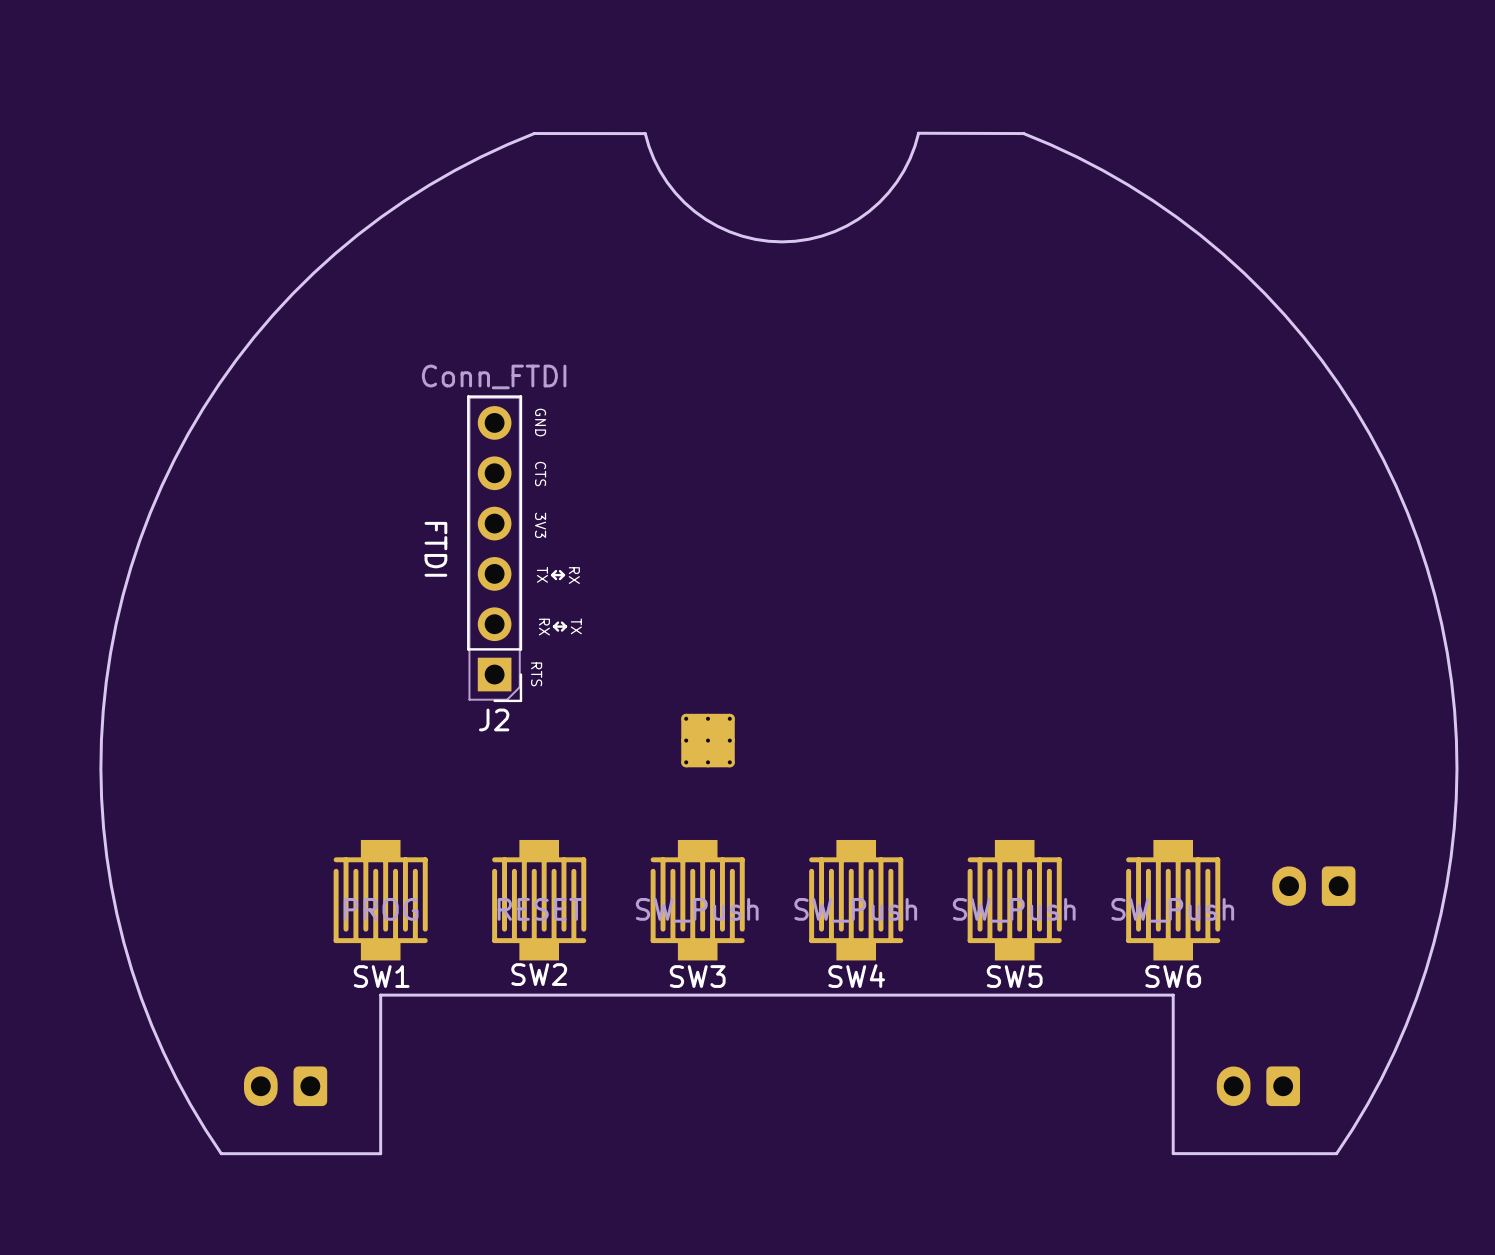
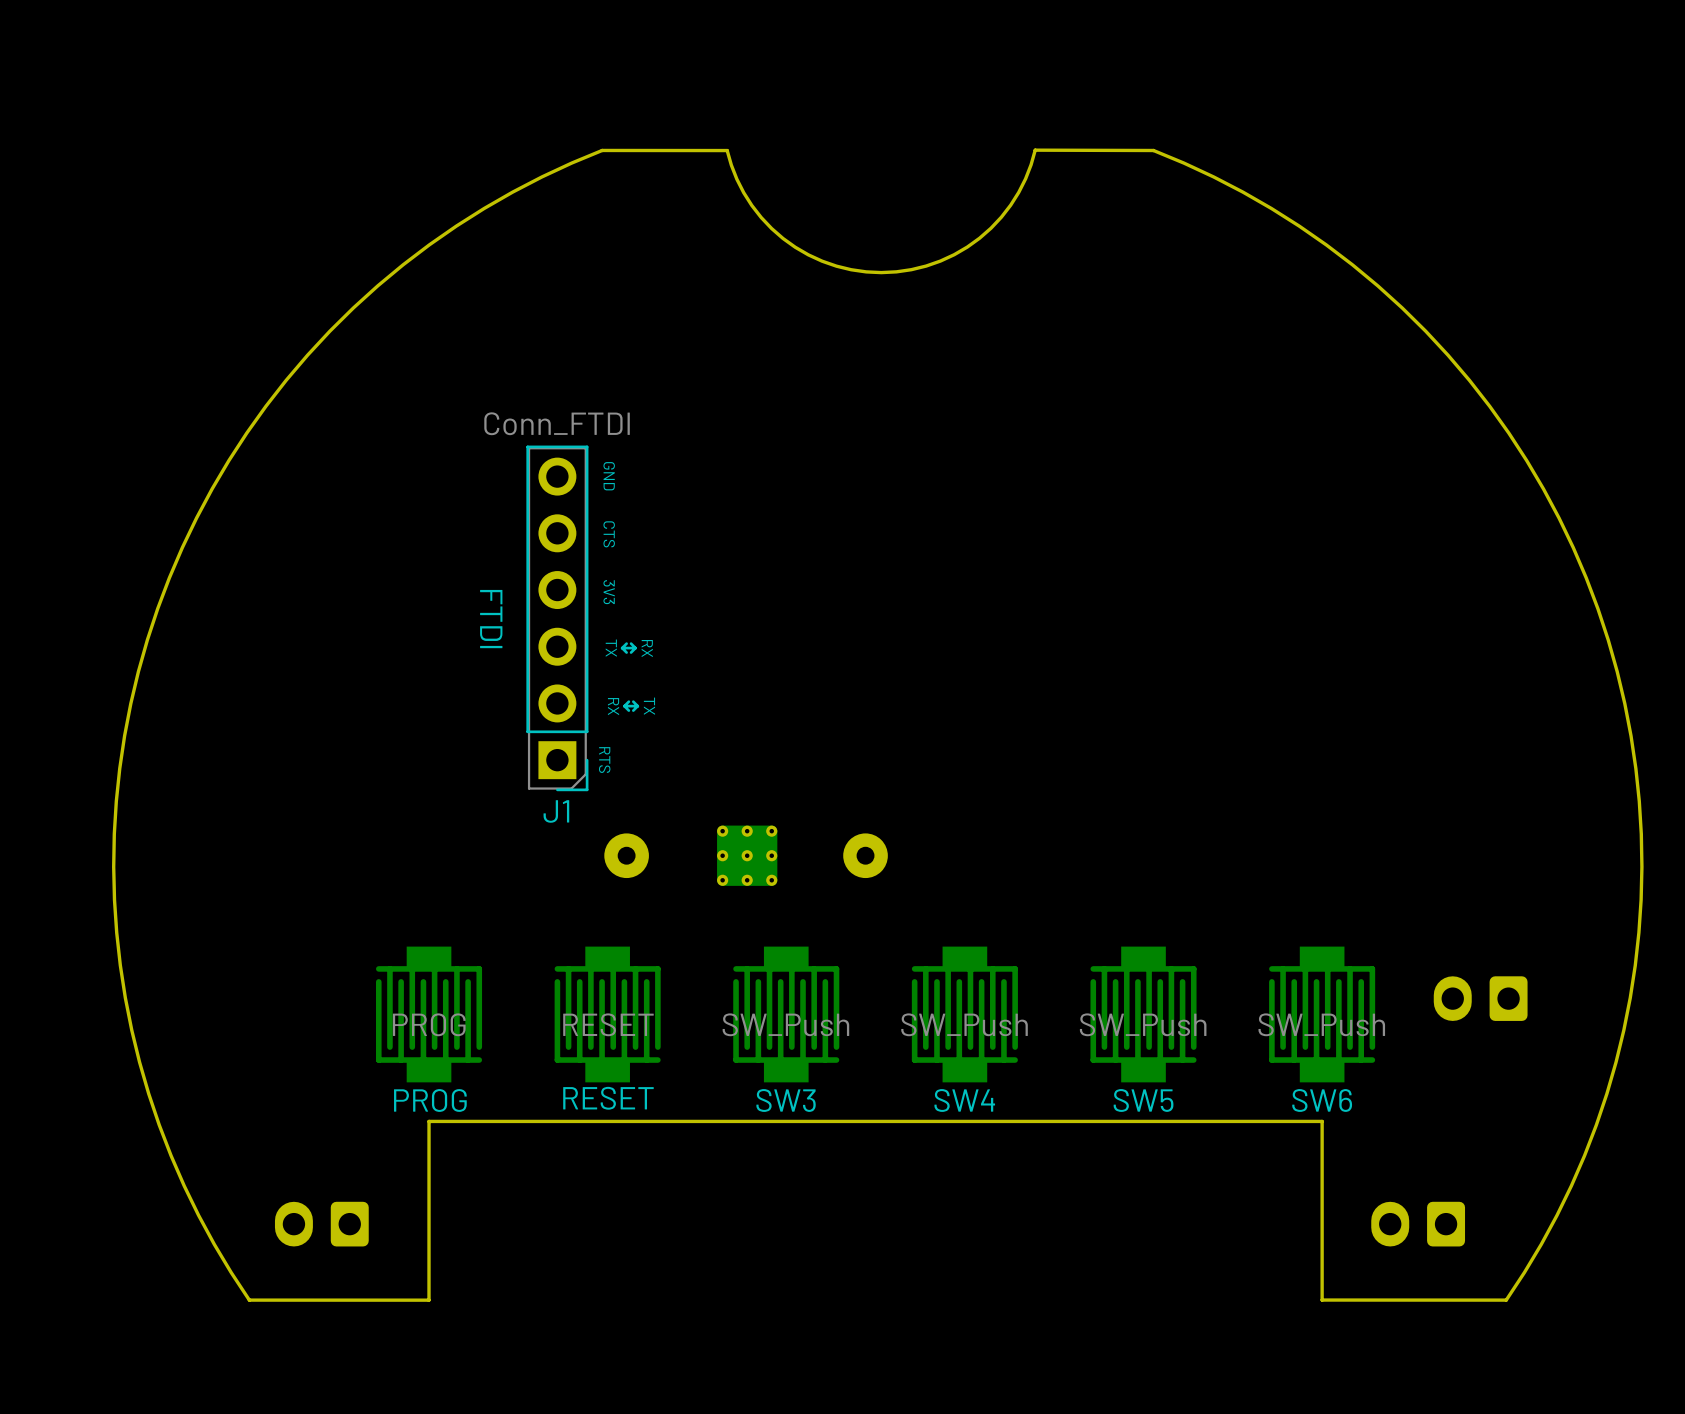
J2 name: J2 (494, 719) -> J1 (556, 811)
part position: (708, 740) -> (747, 855)
part: none -> (626, 855)
part: none -> (865, 855)
SW2 name: SW2 (539, 974) -> RESET (608, 1098)
SW1 name: SW1 (381, 976) -> PROG (430, 1100)

